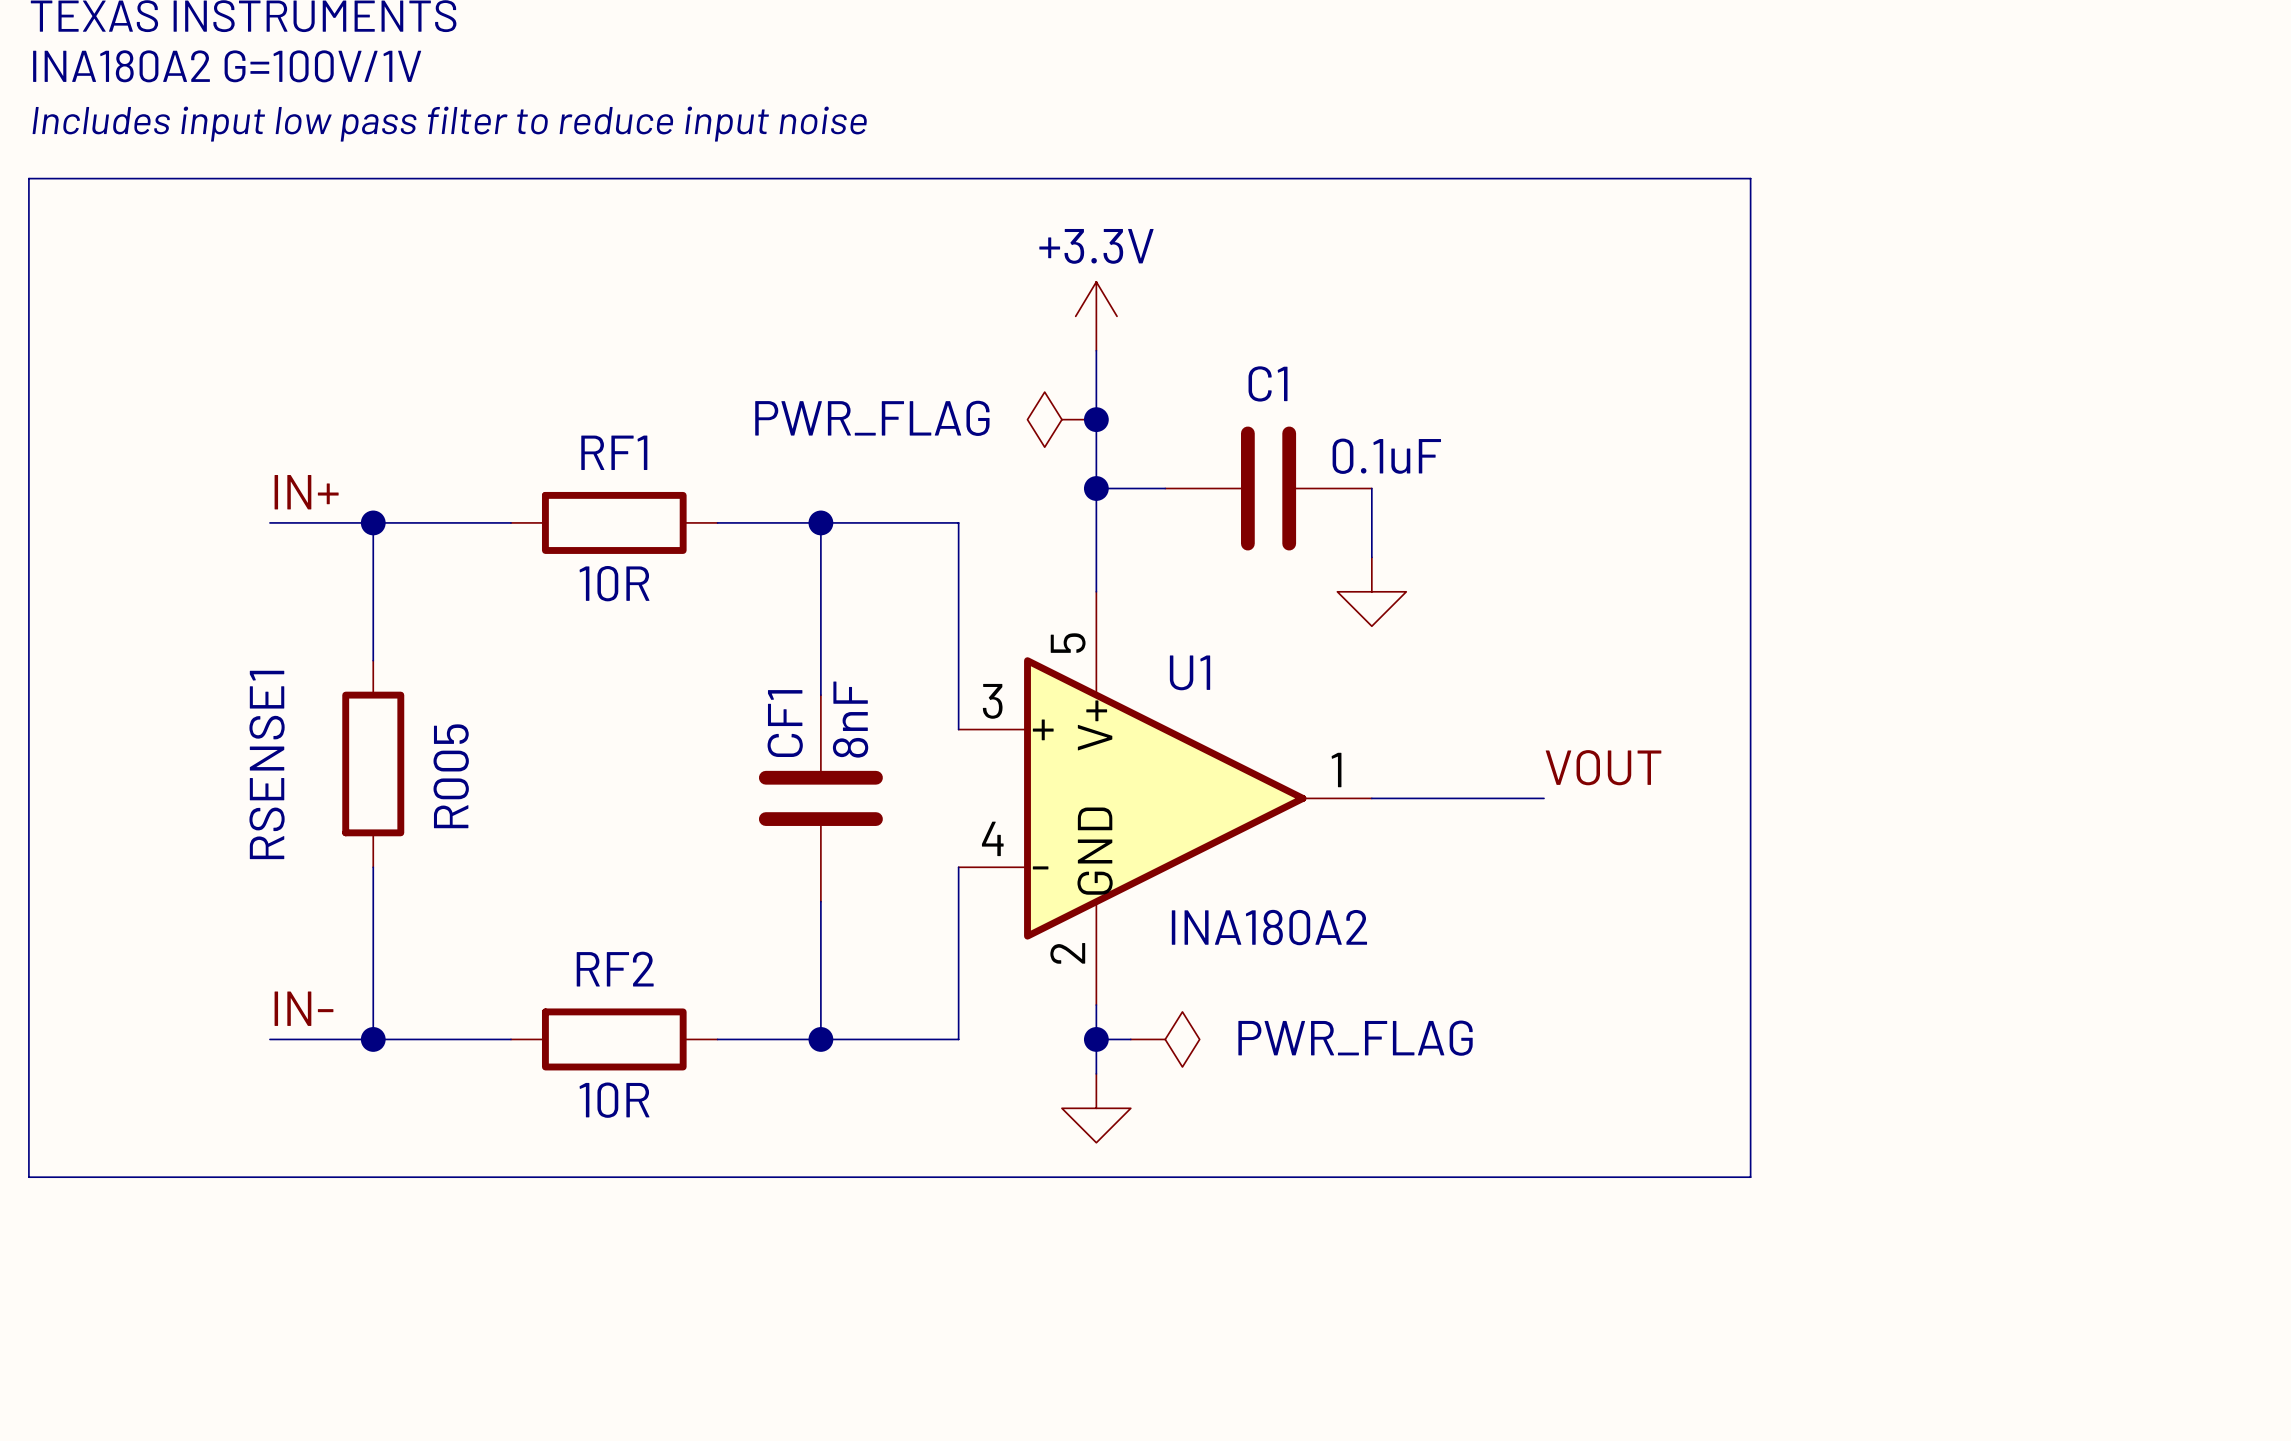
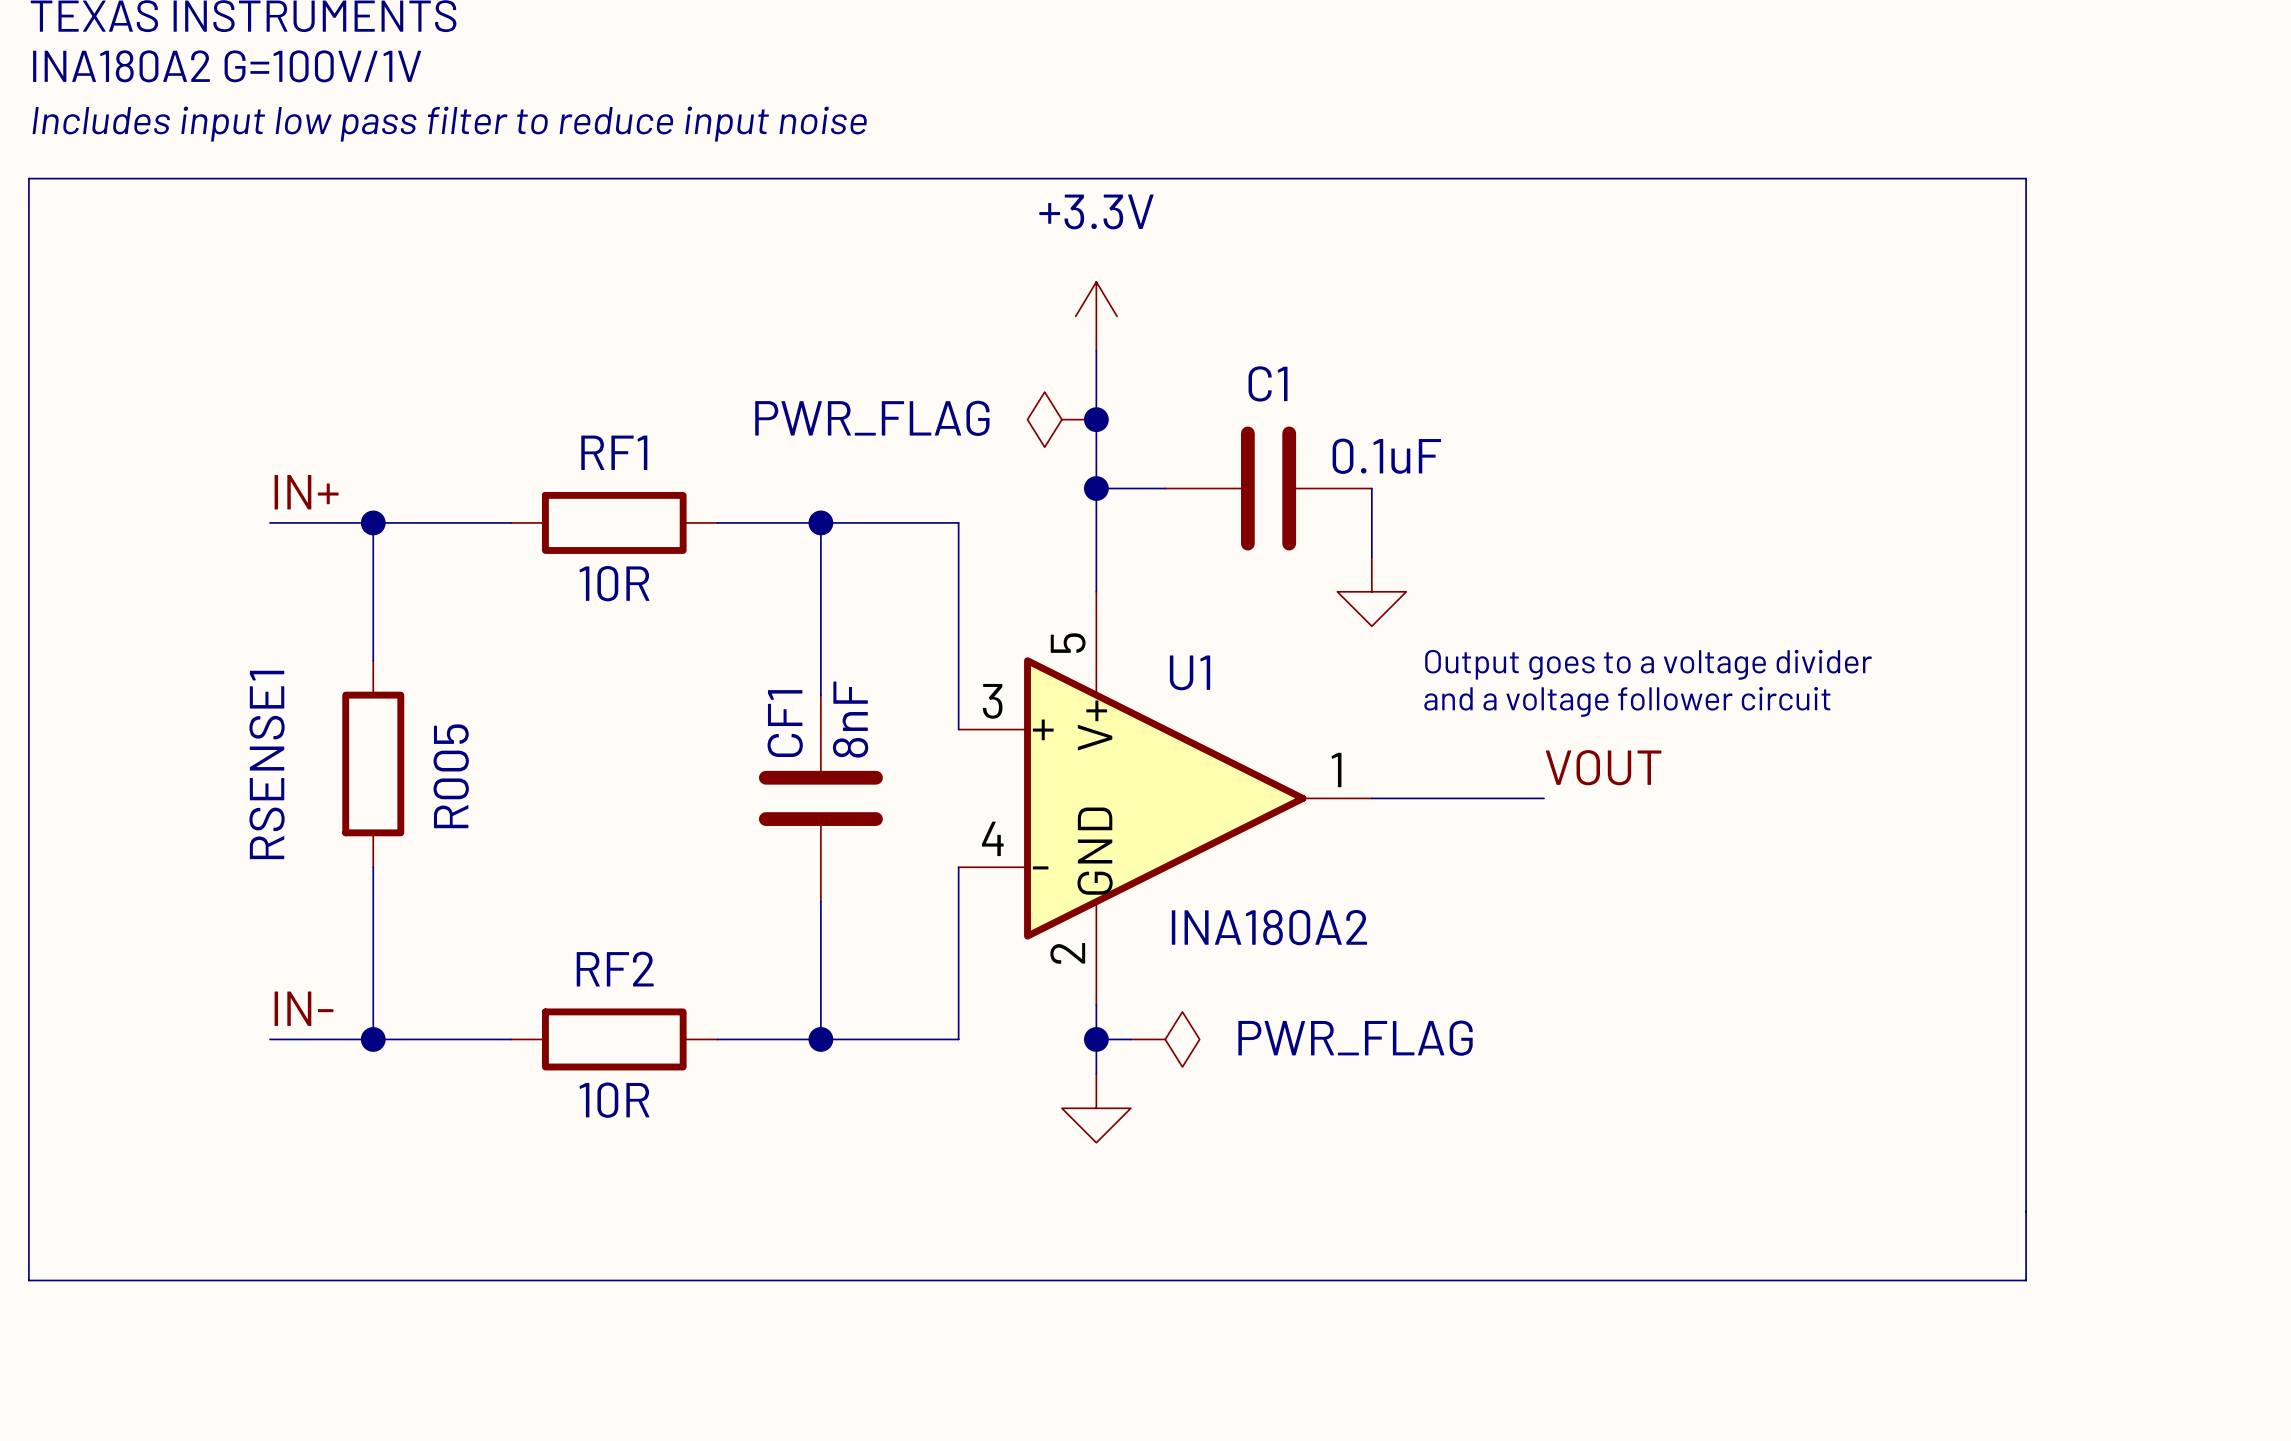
line: (1750, 178) (1750, 1177) (28, 1177) -> (1750, 178) (2026, 178) (2026, 1280) (28, 1280) (28, 1177)
power symbol text position: +3.3V (1096, 246) -> +3.3V (1096, 211)
text: none -> Output goes to a voltage divider (1648, 664)
text: none -> and a voltage follower circuit (1627, 701)

